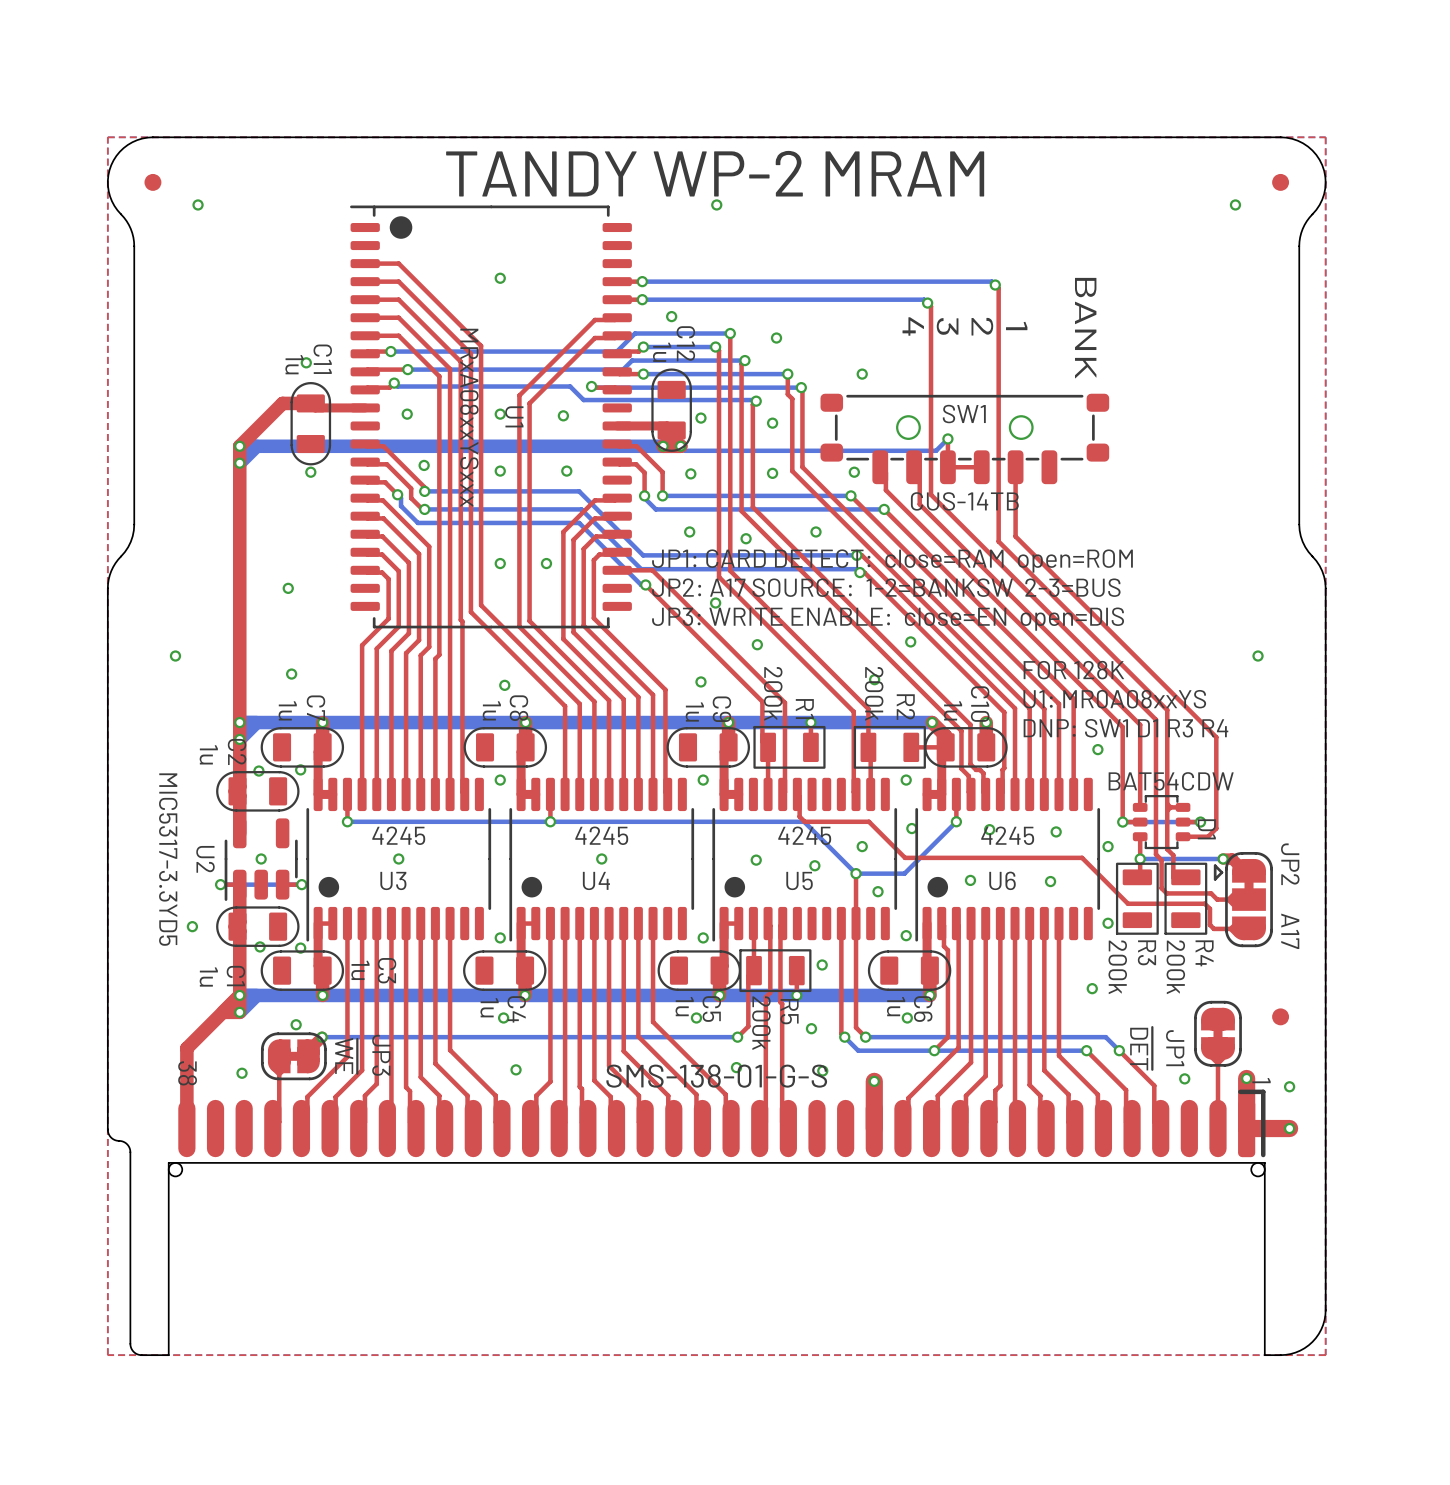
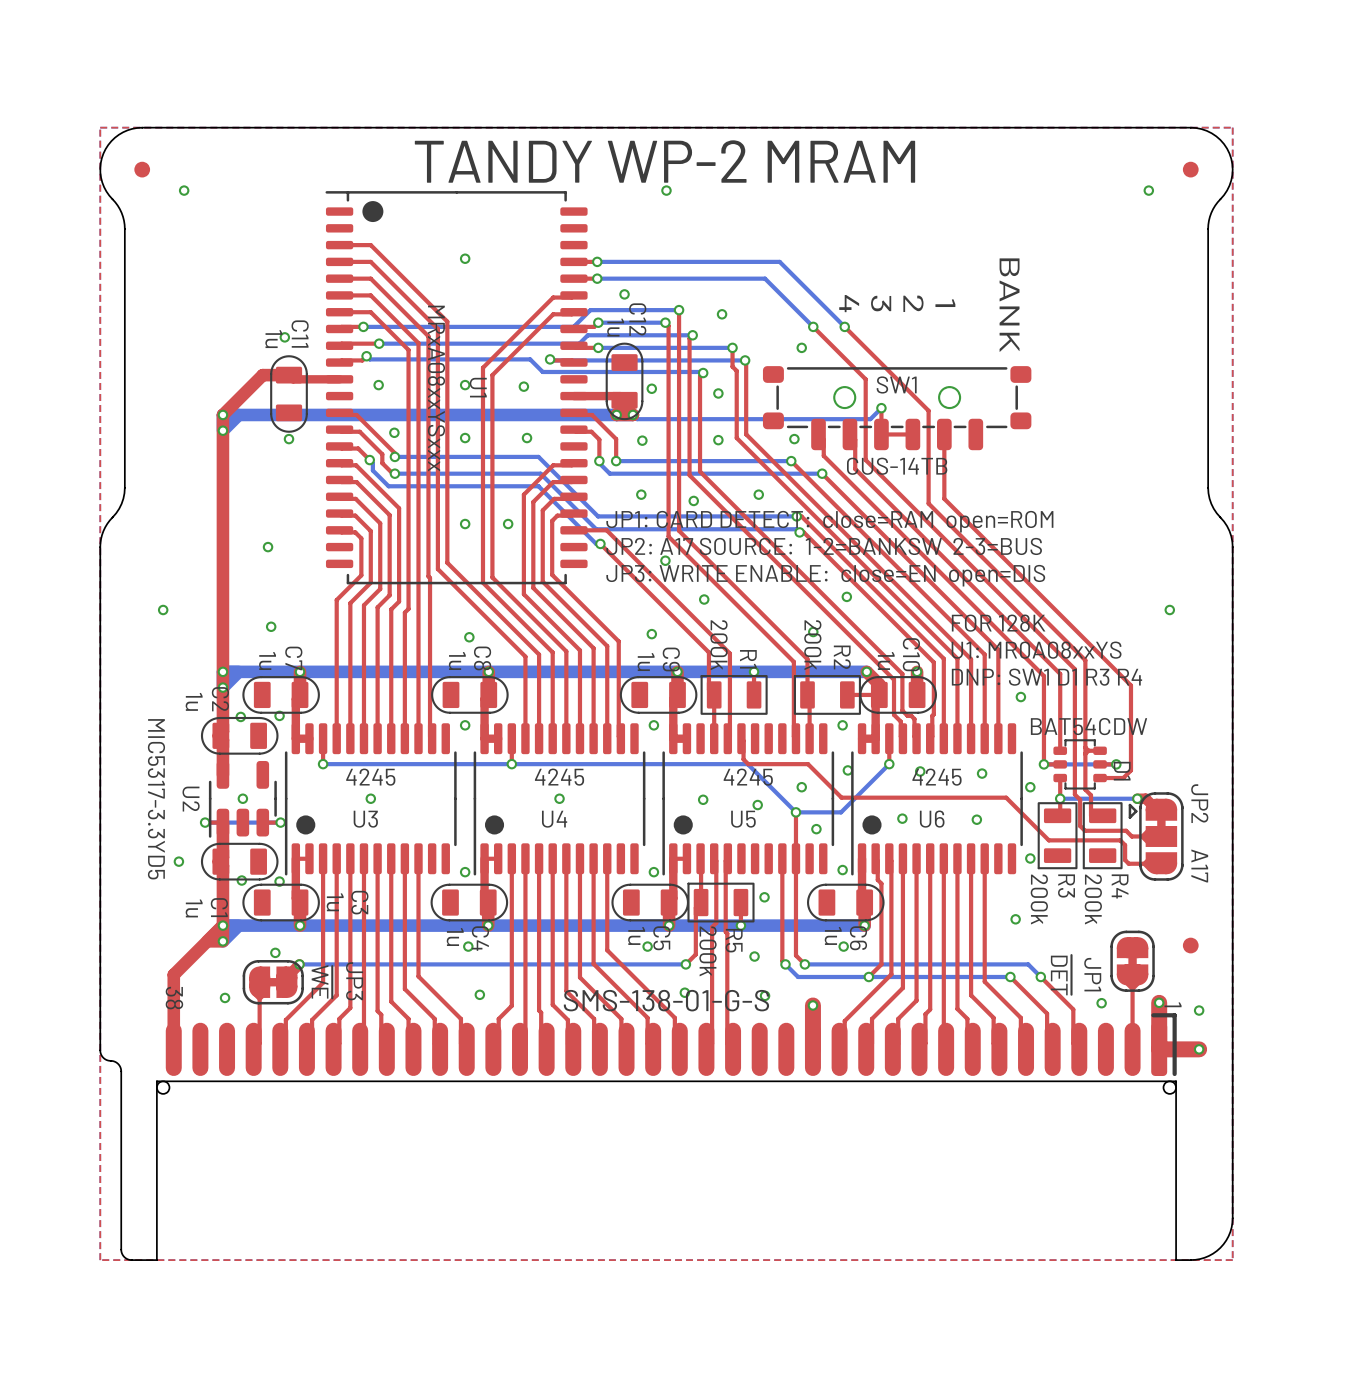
bottom track: (838, 281) (991, 281) (995, 285) -> (779, 261) (844, 326)
top track: (995, 285) (998, 288) (998, 441) -> (844, 326) (928, 410)
via: (995, 285) -> none
bottom track: (822, 299) (924, 299) (927, 303) -> (765, 278) (813, 326)
top track: (927, 303) (931, 306) (931, 407) -> (813, 326) (865, 379)
via: (927, 303) -> none
via: none -> (813, 326)
via: none -> (844, 326)

